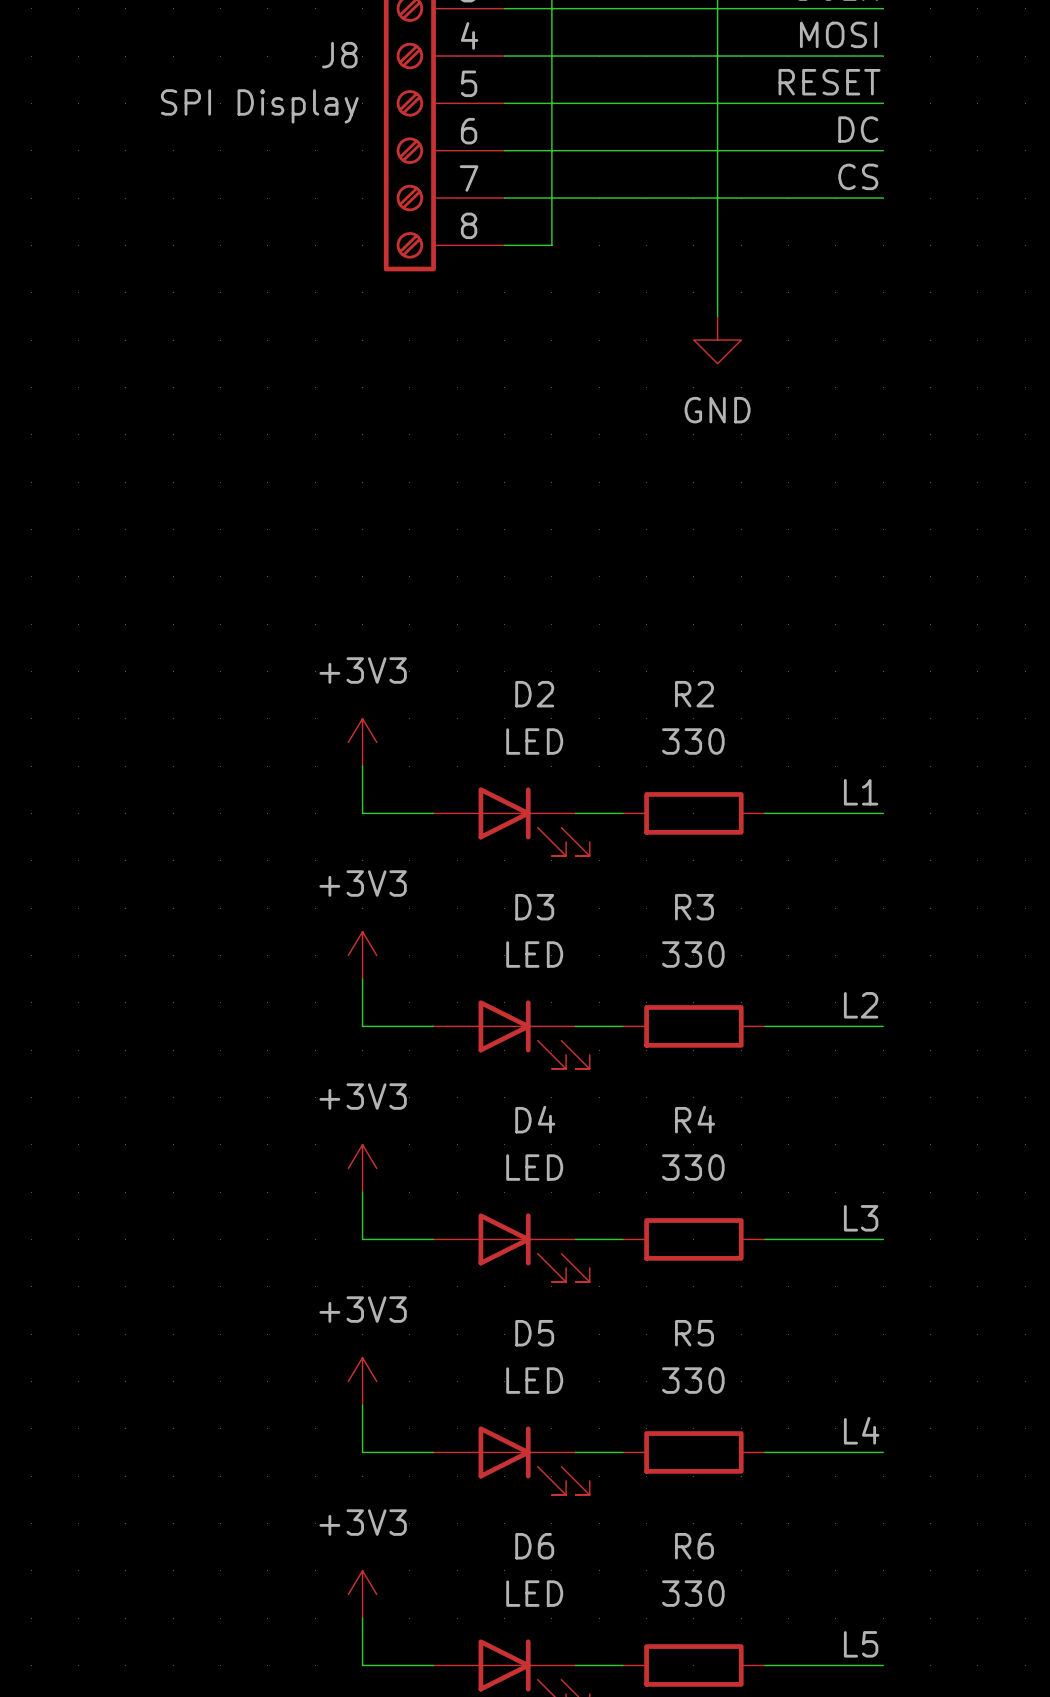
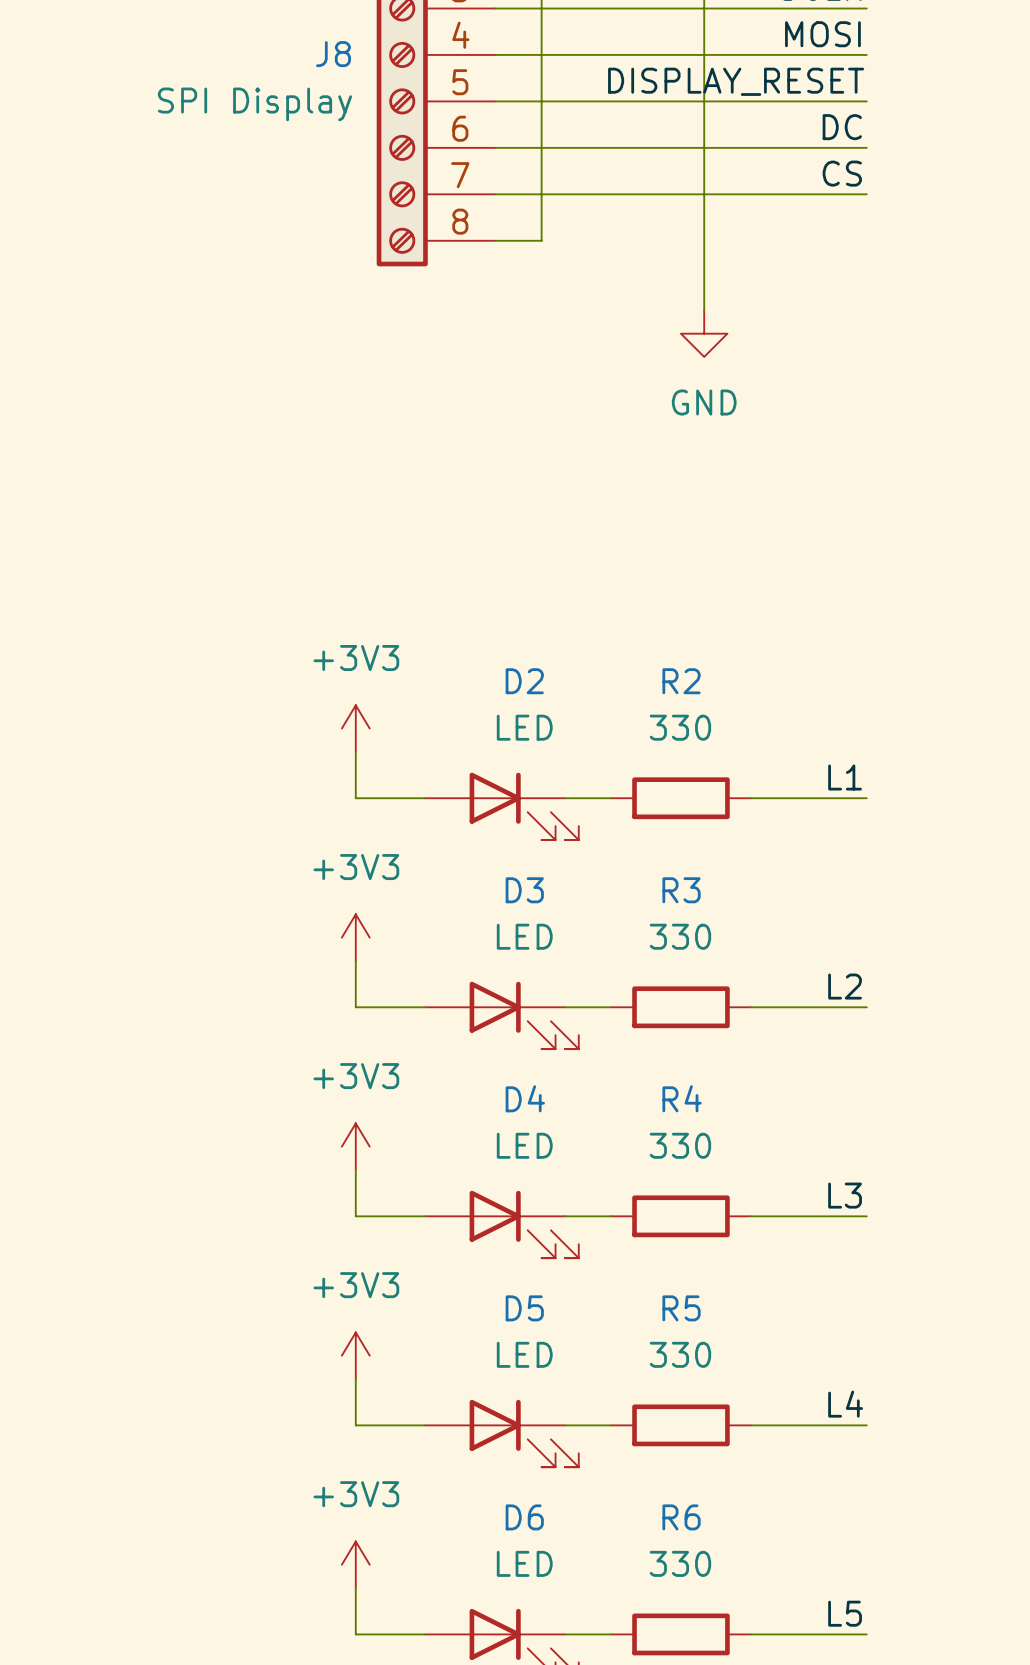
label: RESET (829, 82) -> DISPLAY_RESET (736, 81)

